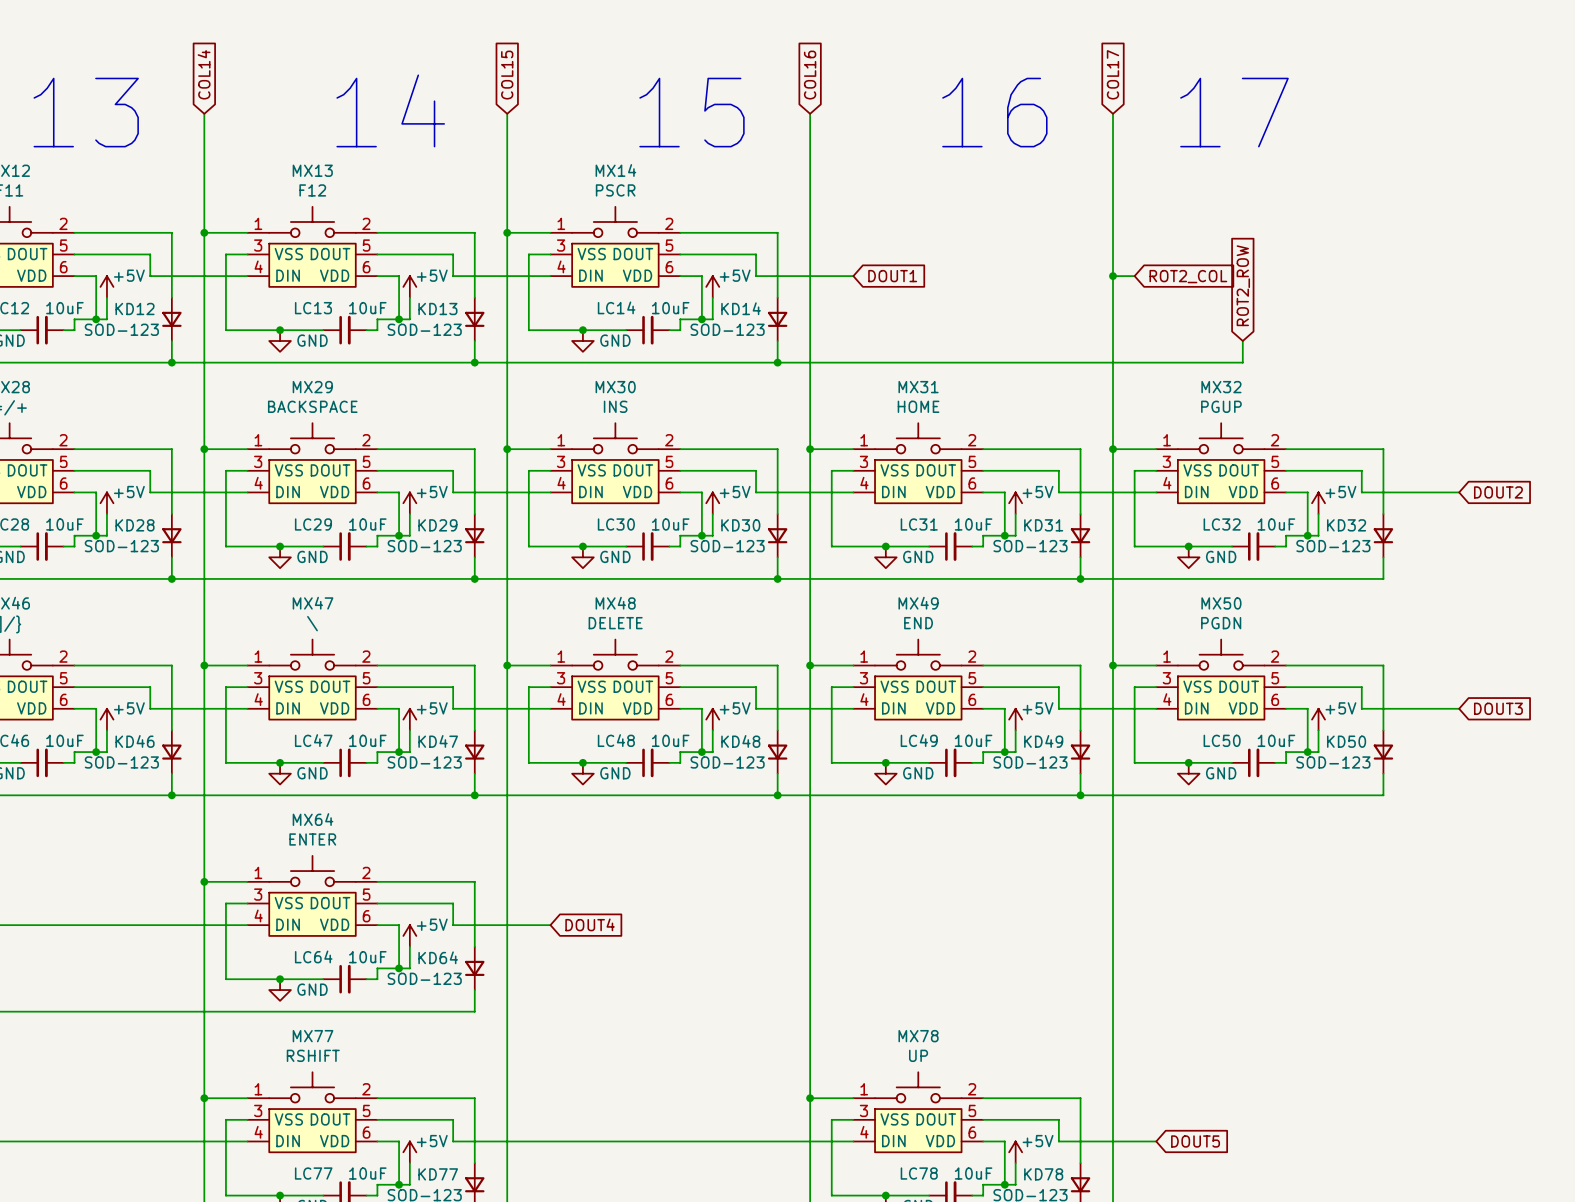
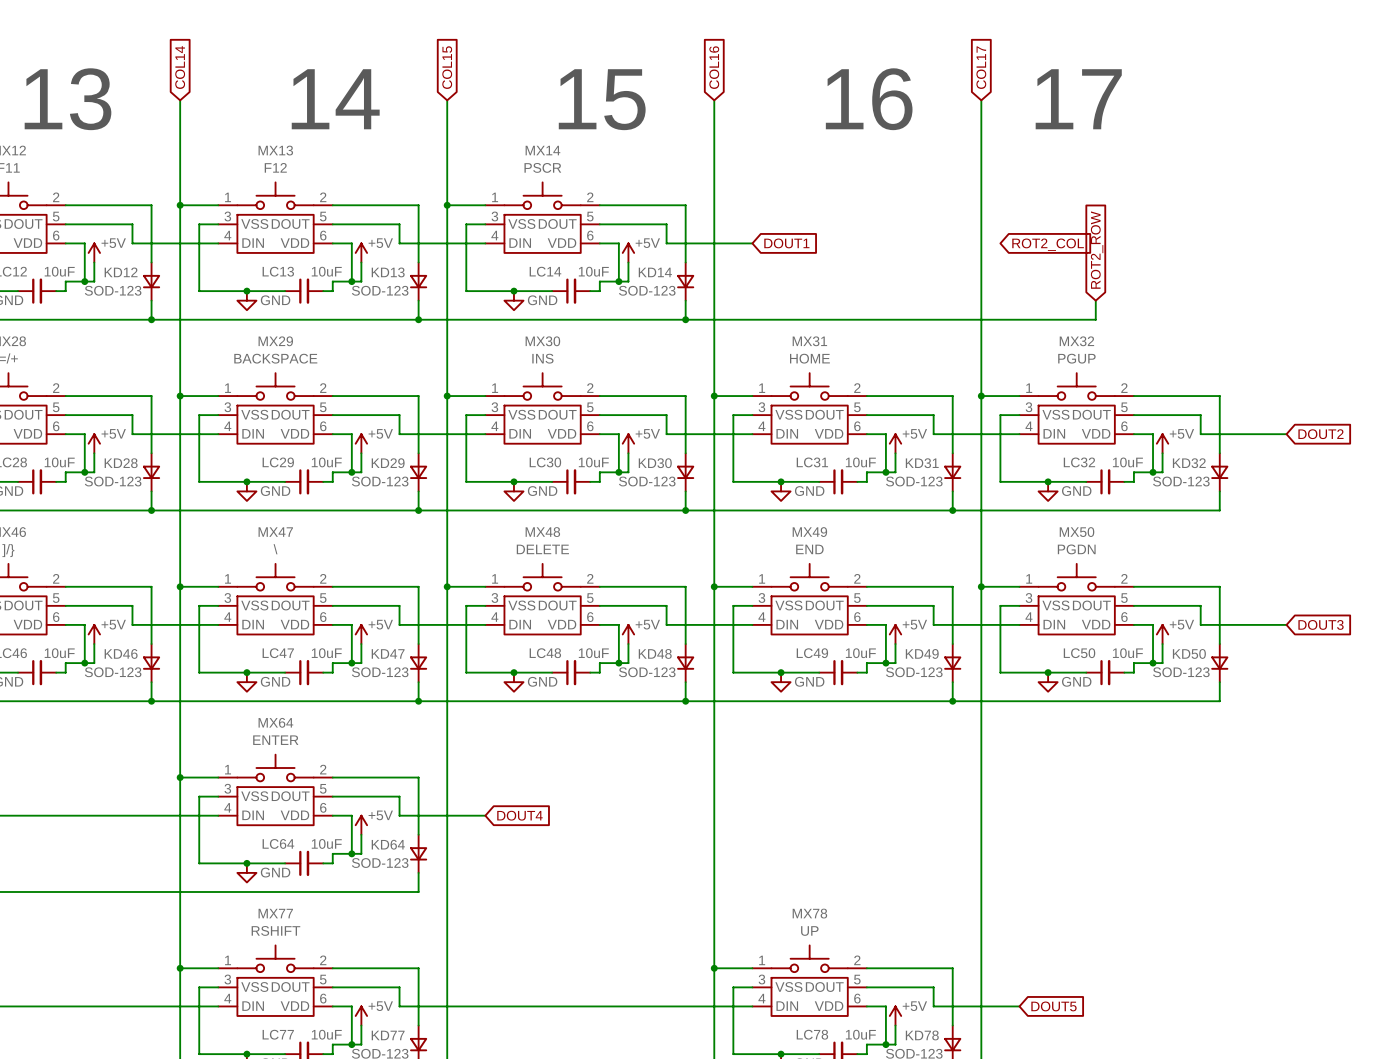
wire: (1113, 276) (1134, 276) -> none
junction: (1113, 276) -> none

